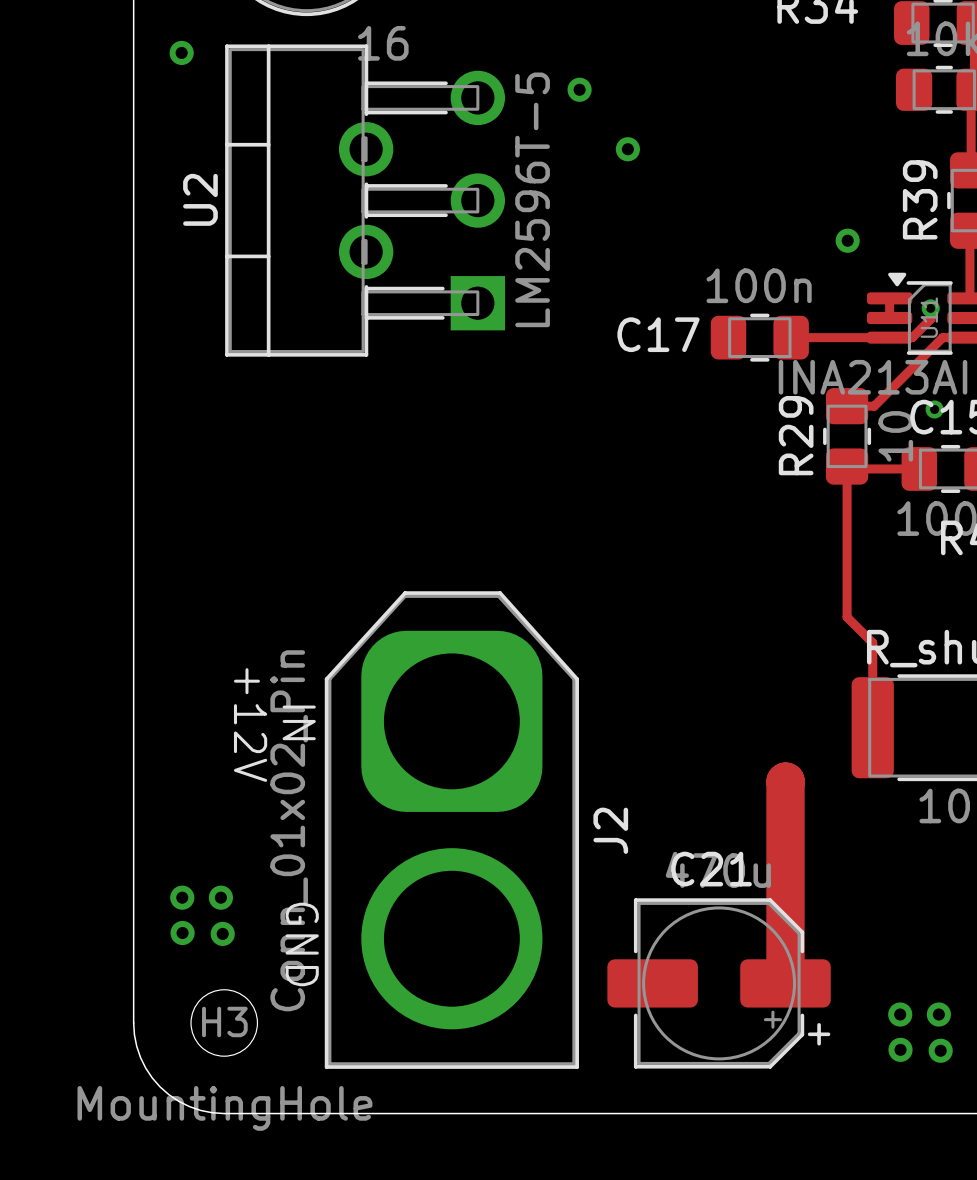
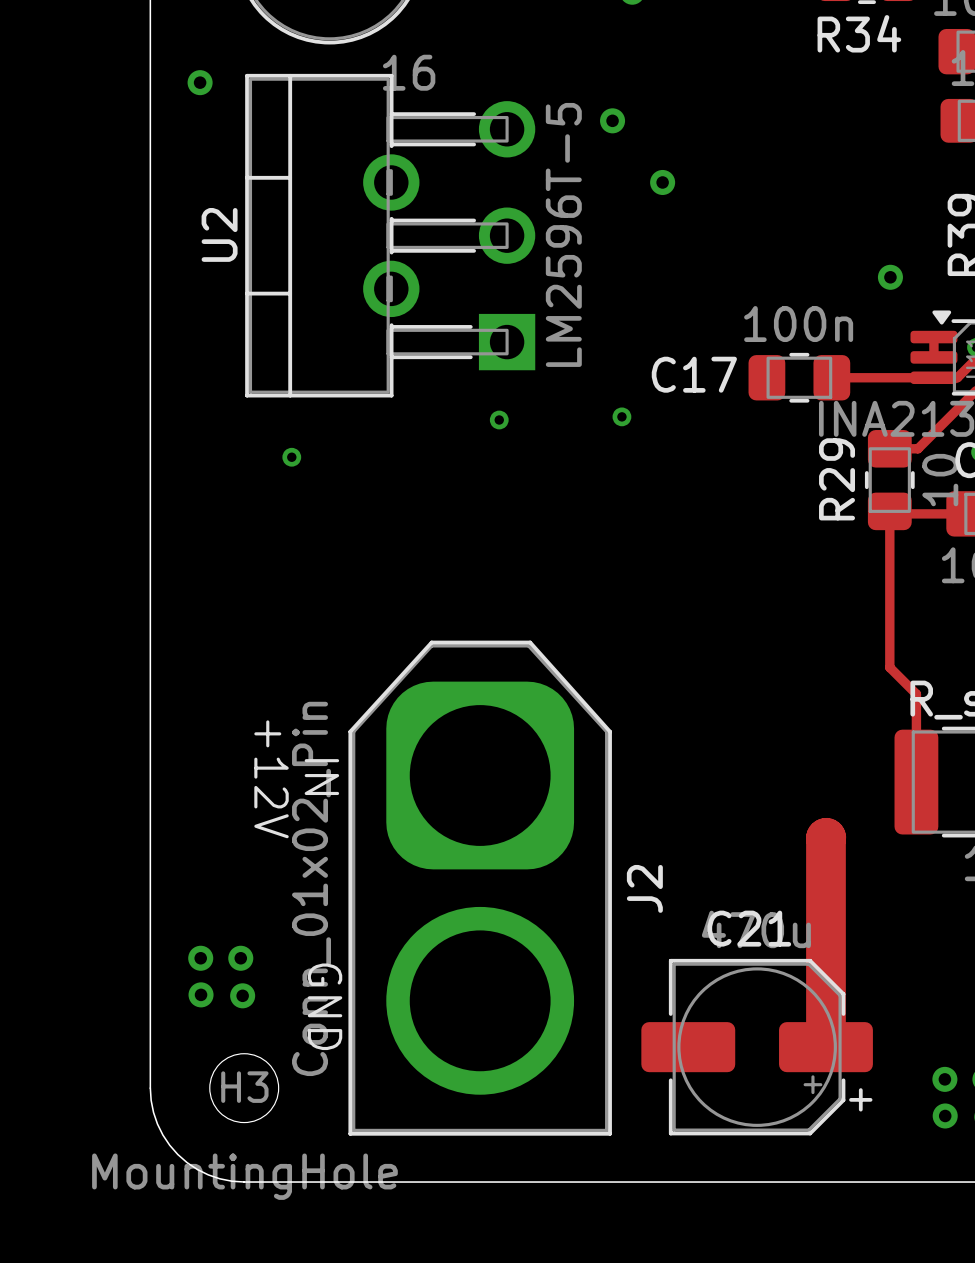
via: none -> (621, 416)
via: none -> (499, 420)
via: none -> (291, 457)

